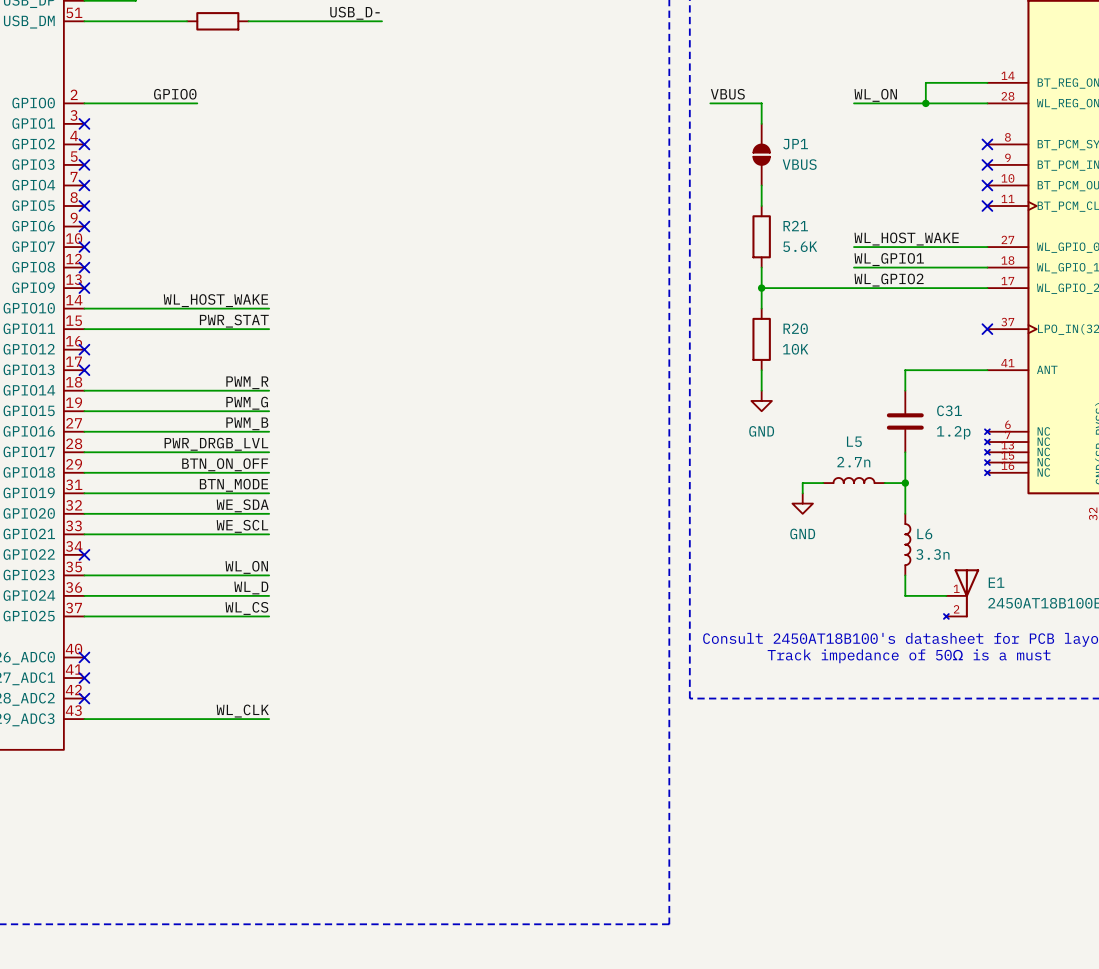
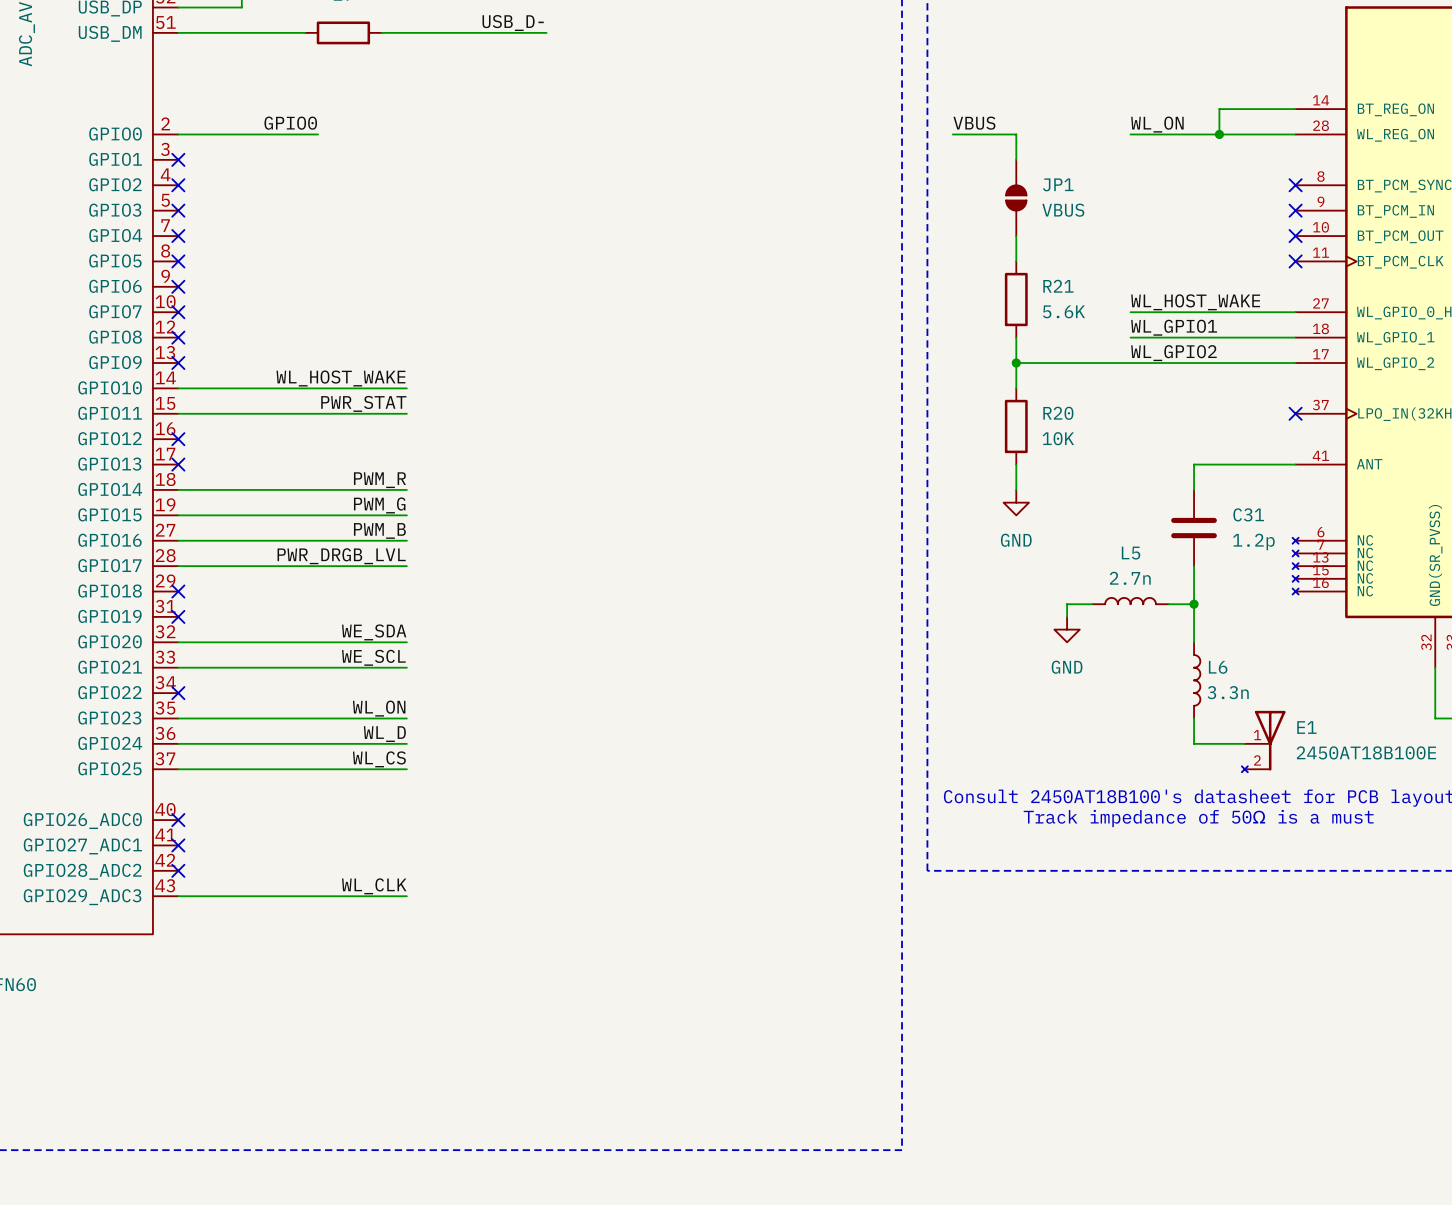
label: BTN_ON_OFF (225, 464) -> none
wire: (84, 472) (269, 472) -> none
no-connect mark: none -> (178, 591)
label: BTN_MODE (233, 485) -> none
wire: (84, 493) (269, 493) -> none
no-connect mark: none -> (178, 616)

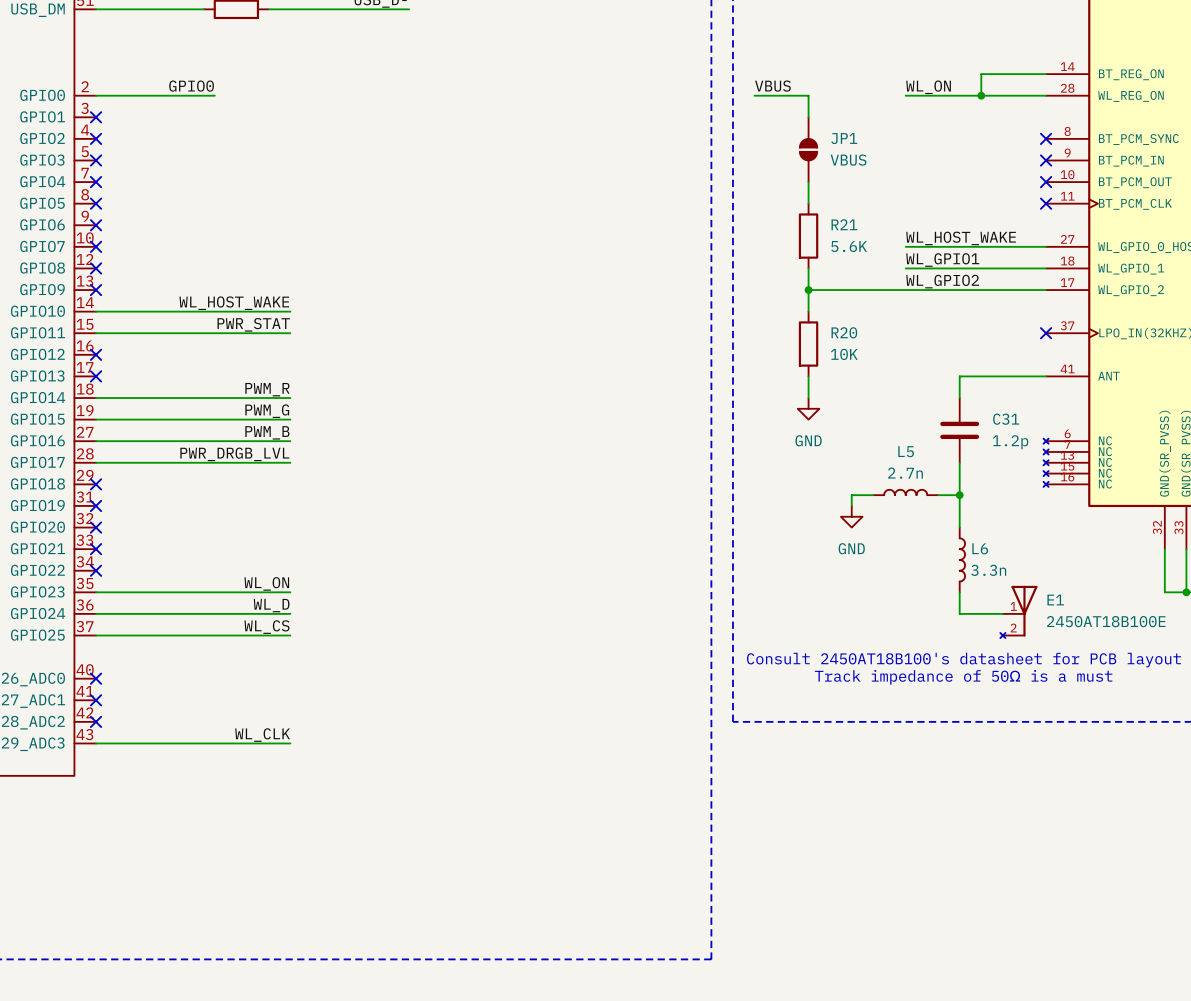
label: WE_SDA (374, 632) -> none
wire: (178, 642) (406, 642) -> none
no-connect mark: none -> (96, 527)
label: WE_SCL (373, 657) -> none
wire: (178, 667) (406, 667) -> none
no-connect mark: none -> (96, 549)

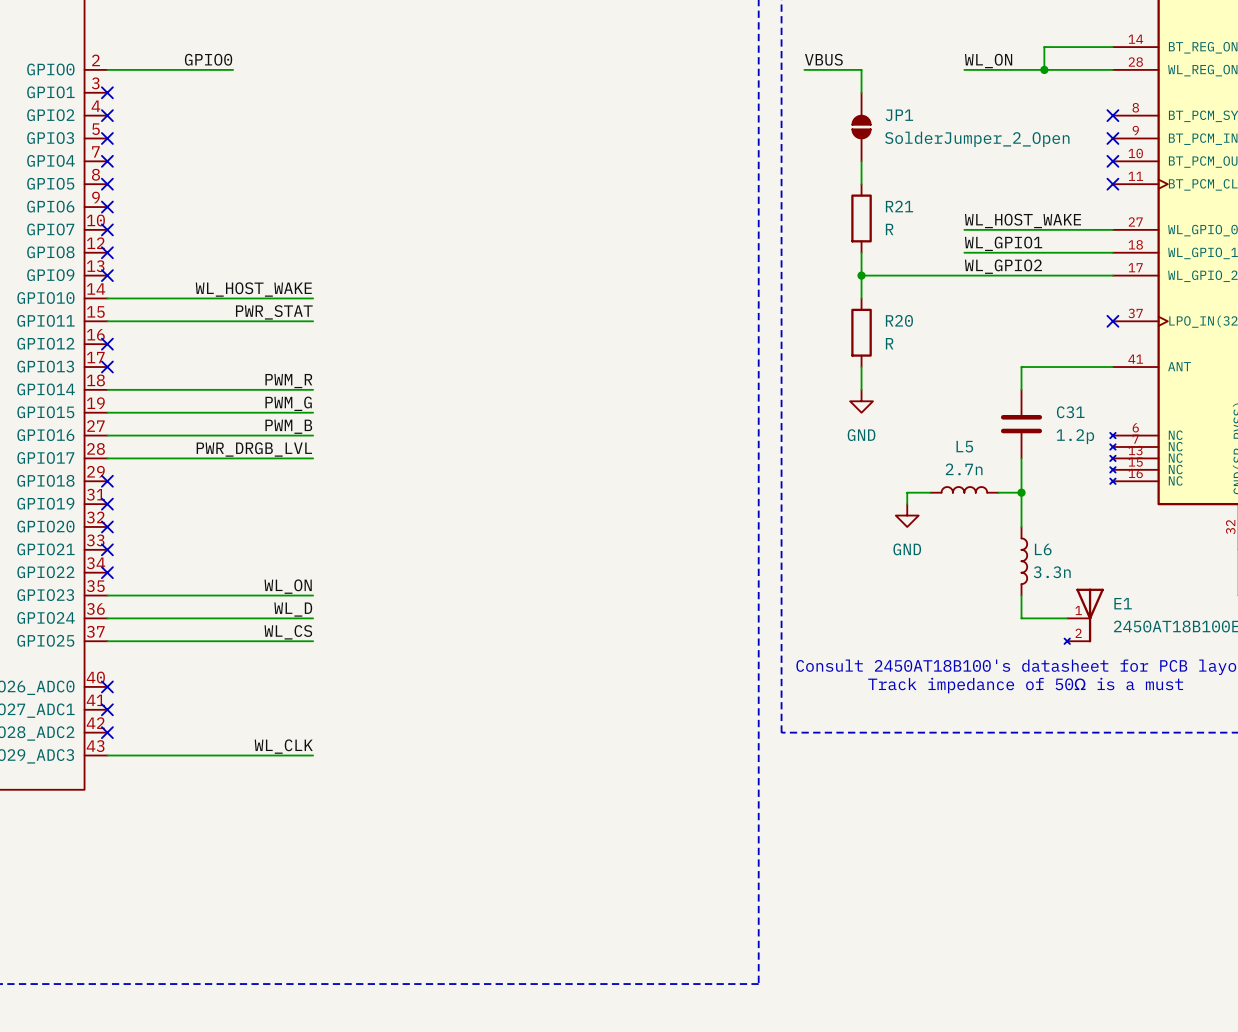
JP1 value: VBUS (848, 160) -> SolderJumper_2_Open (977, 139)
R21 value: 5.6K (849, 246) -> R (889, 229)
R20 value: 10K (844, 354) -> R (889, 343)

